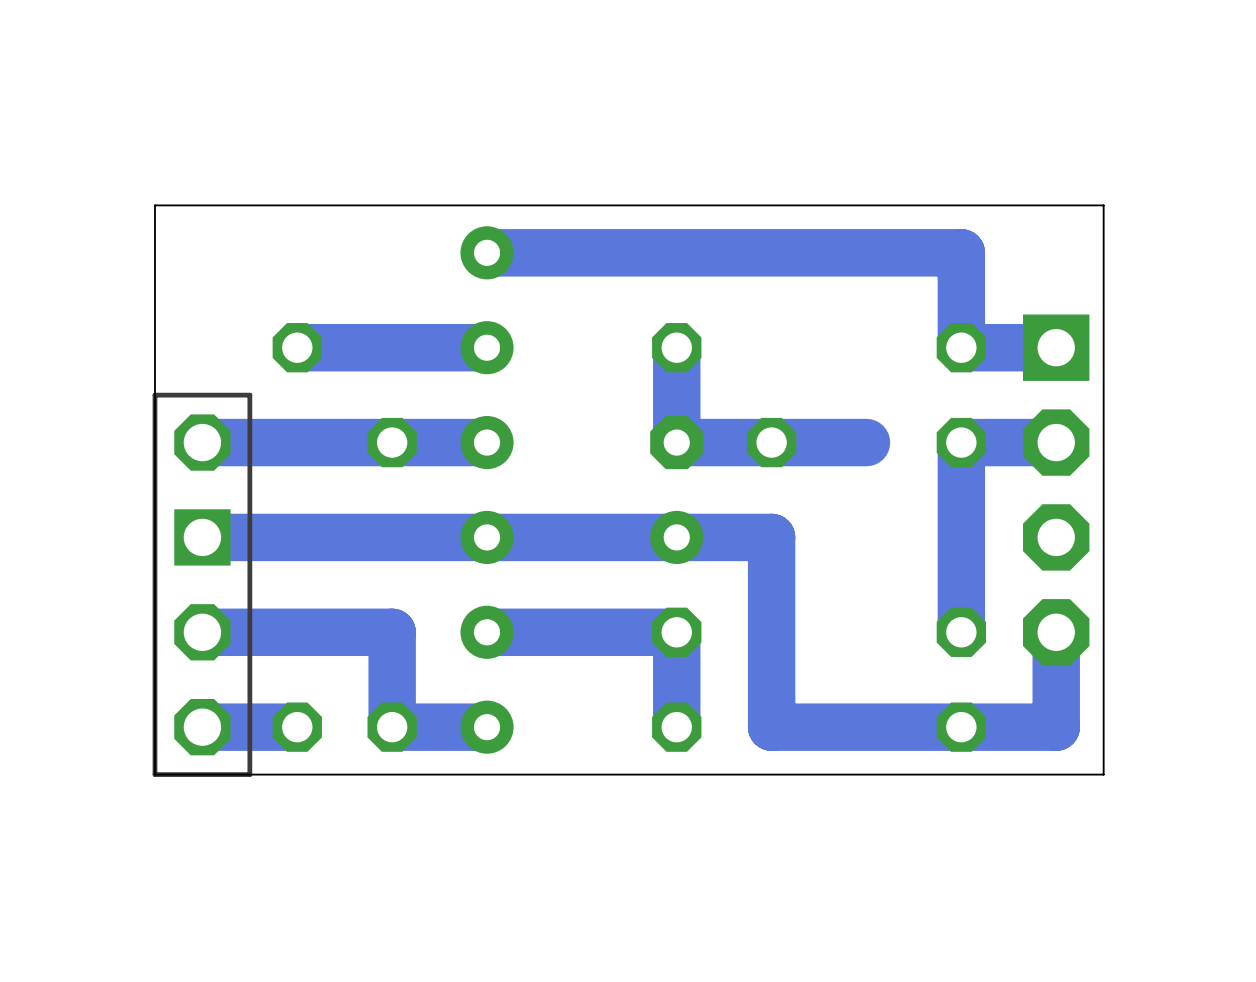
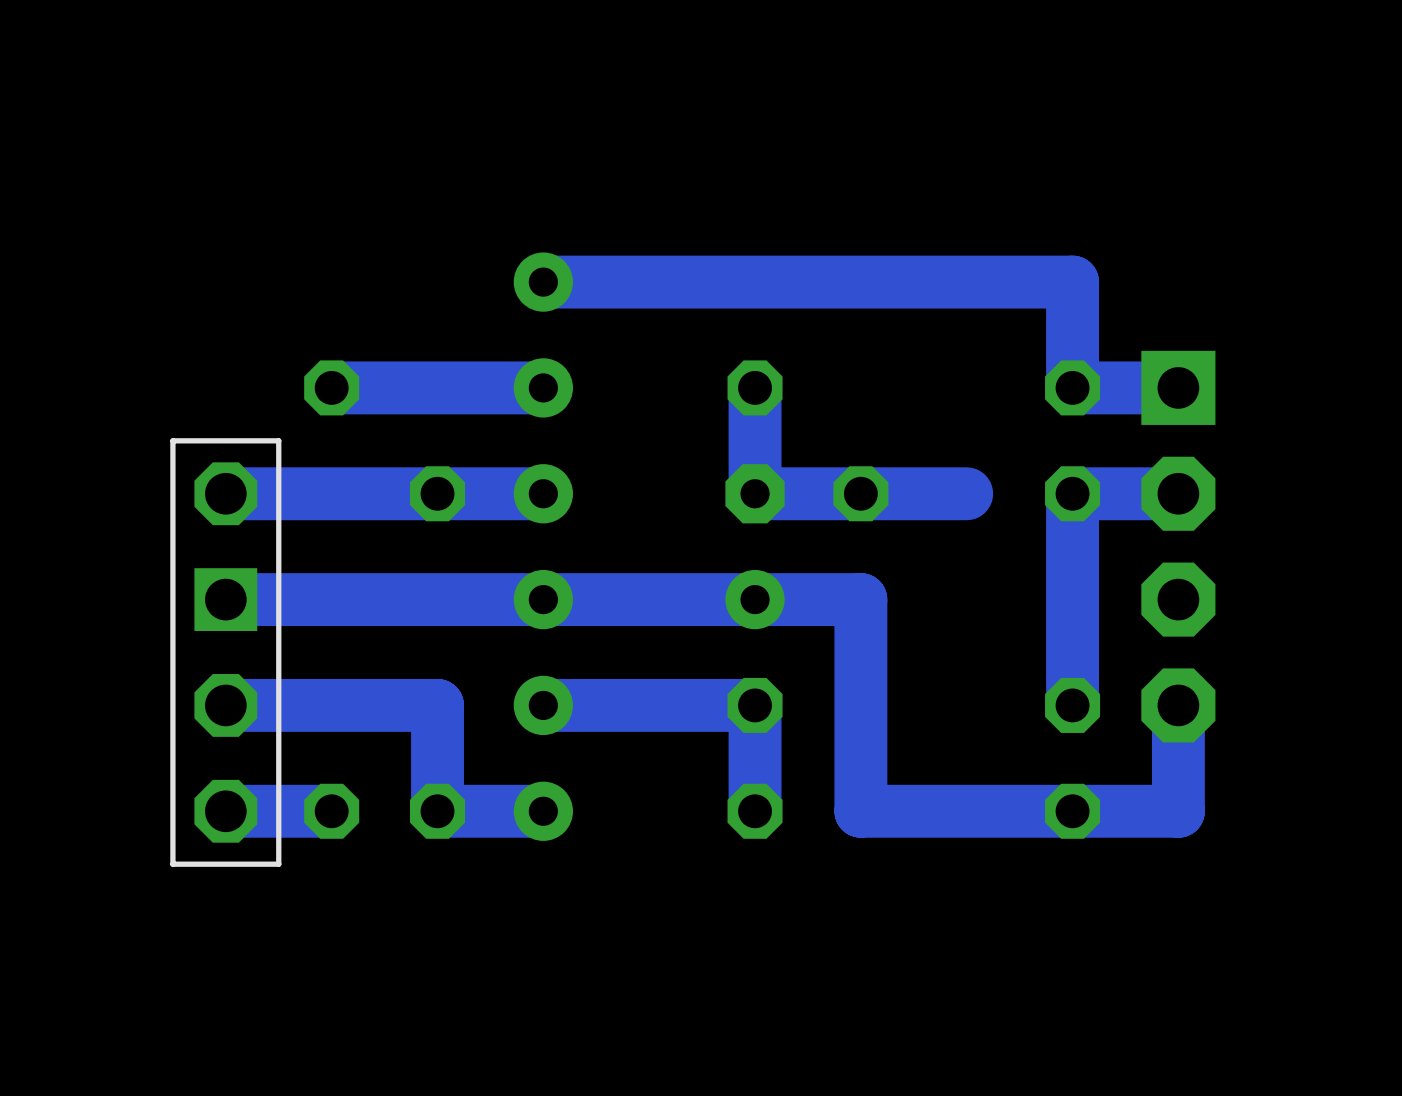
board edge: (1103, 205) (154, 205) (154, 774) (1103, 774) (1103, 205) -> none

